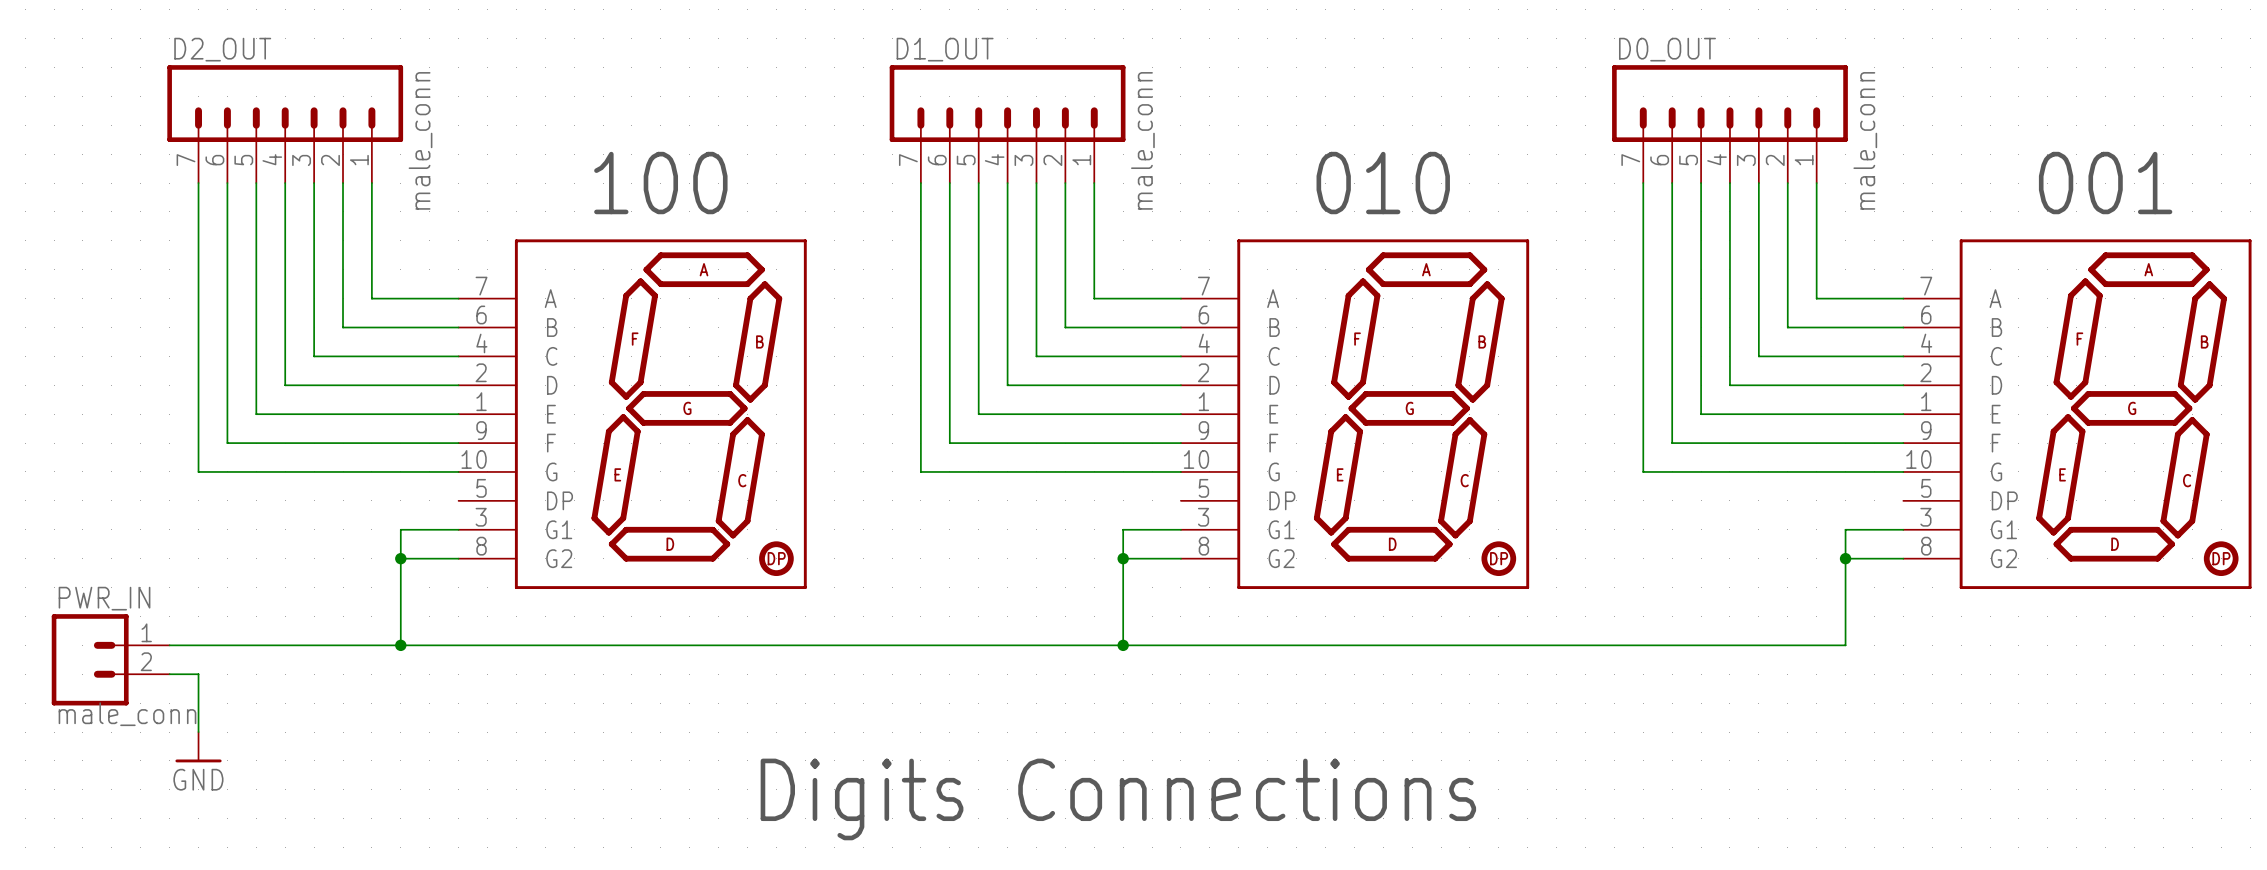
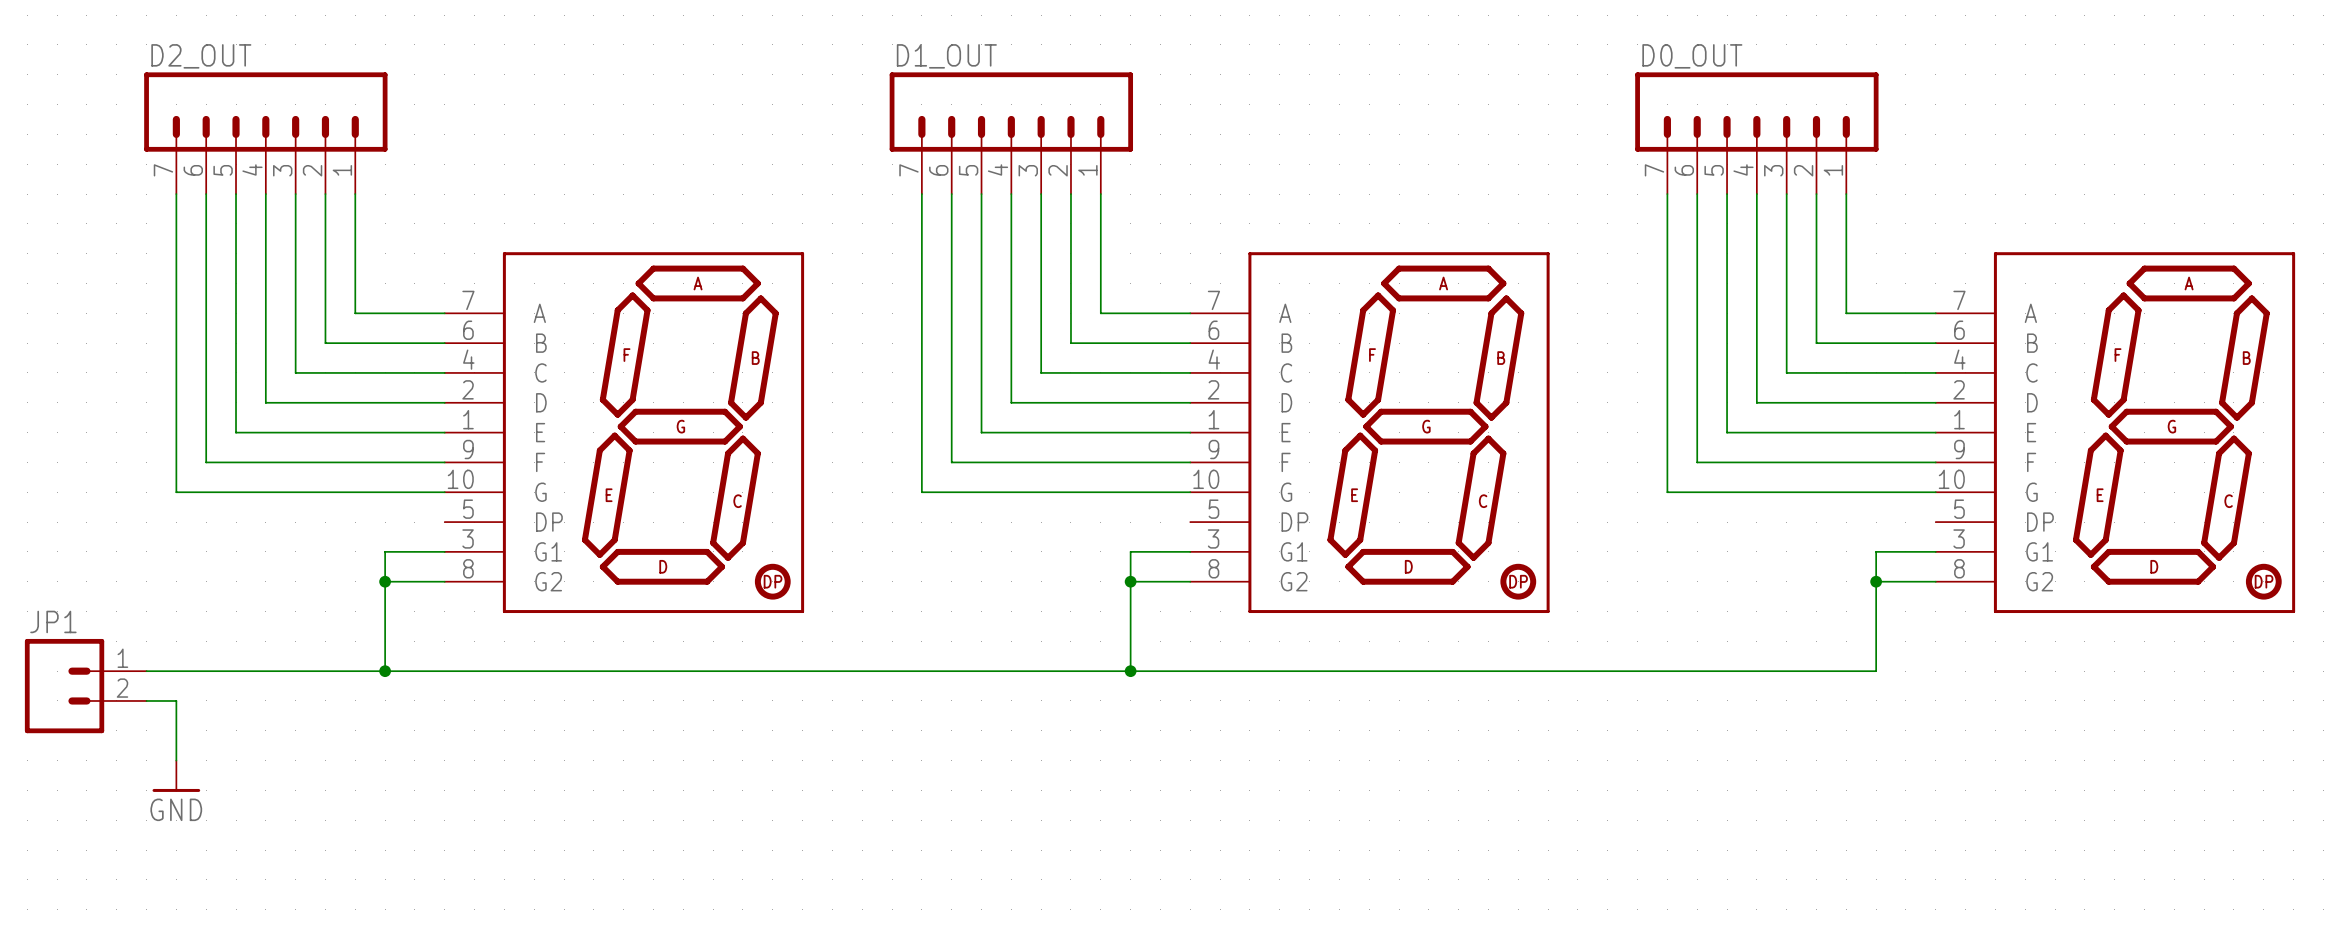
D2_OUT value: male_conn (420, 140) -> none
D1_OUT value: male_conn (1142, 140) -> none
D0_OUT value: male_conn (1865, 140) -> none
text: 100 (660, 183) -> none
text: 010 (1383, 183) -> none
text: 001 (2105, 183) -> none
PWR_IN name: PWR_IN (104, 598) -> JP1 (53, 621)
PWR_IN value: male_conn (127, 714) -> none
text: Digits Connections (1118, 799) -> none

